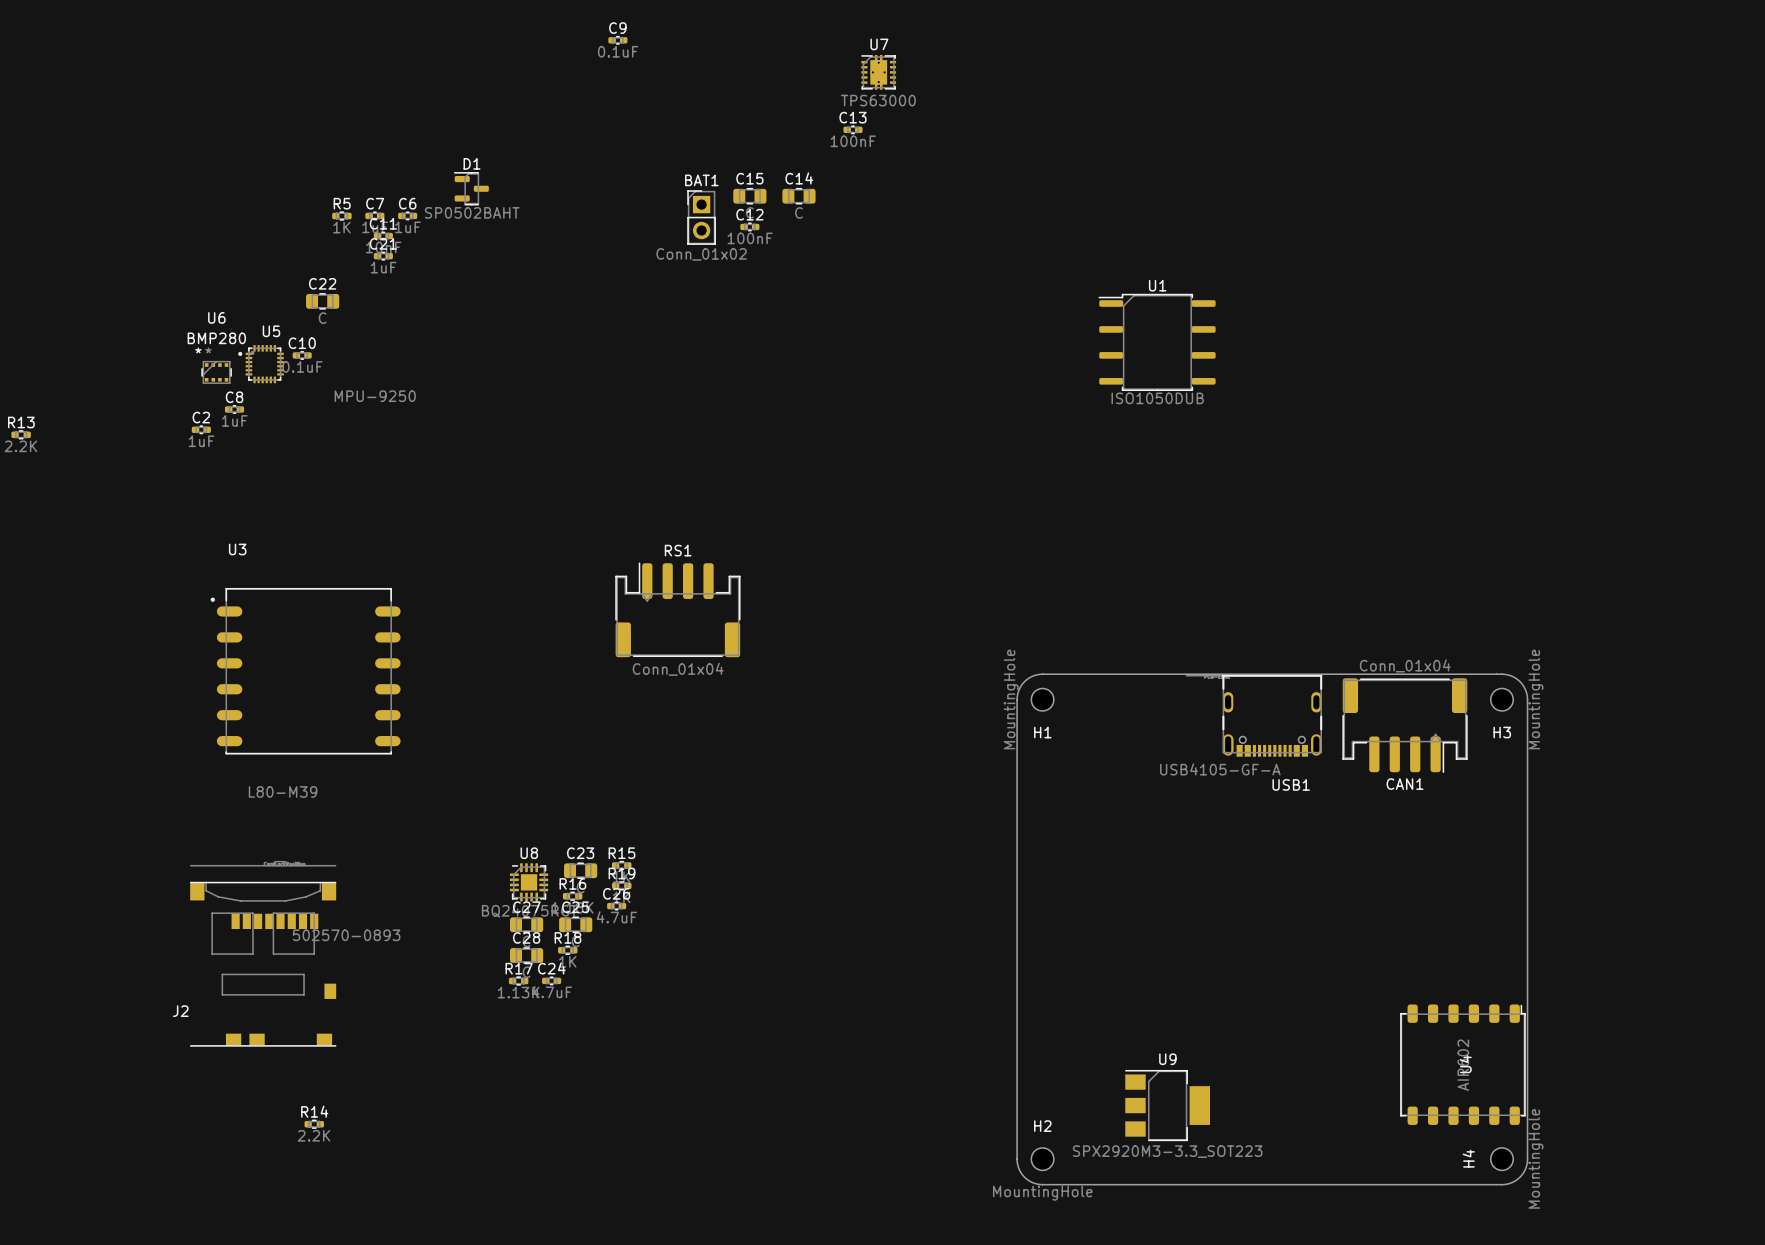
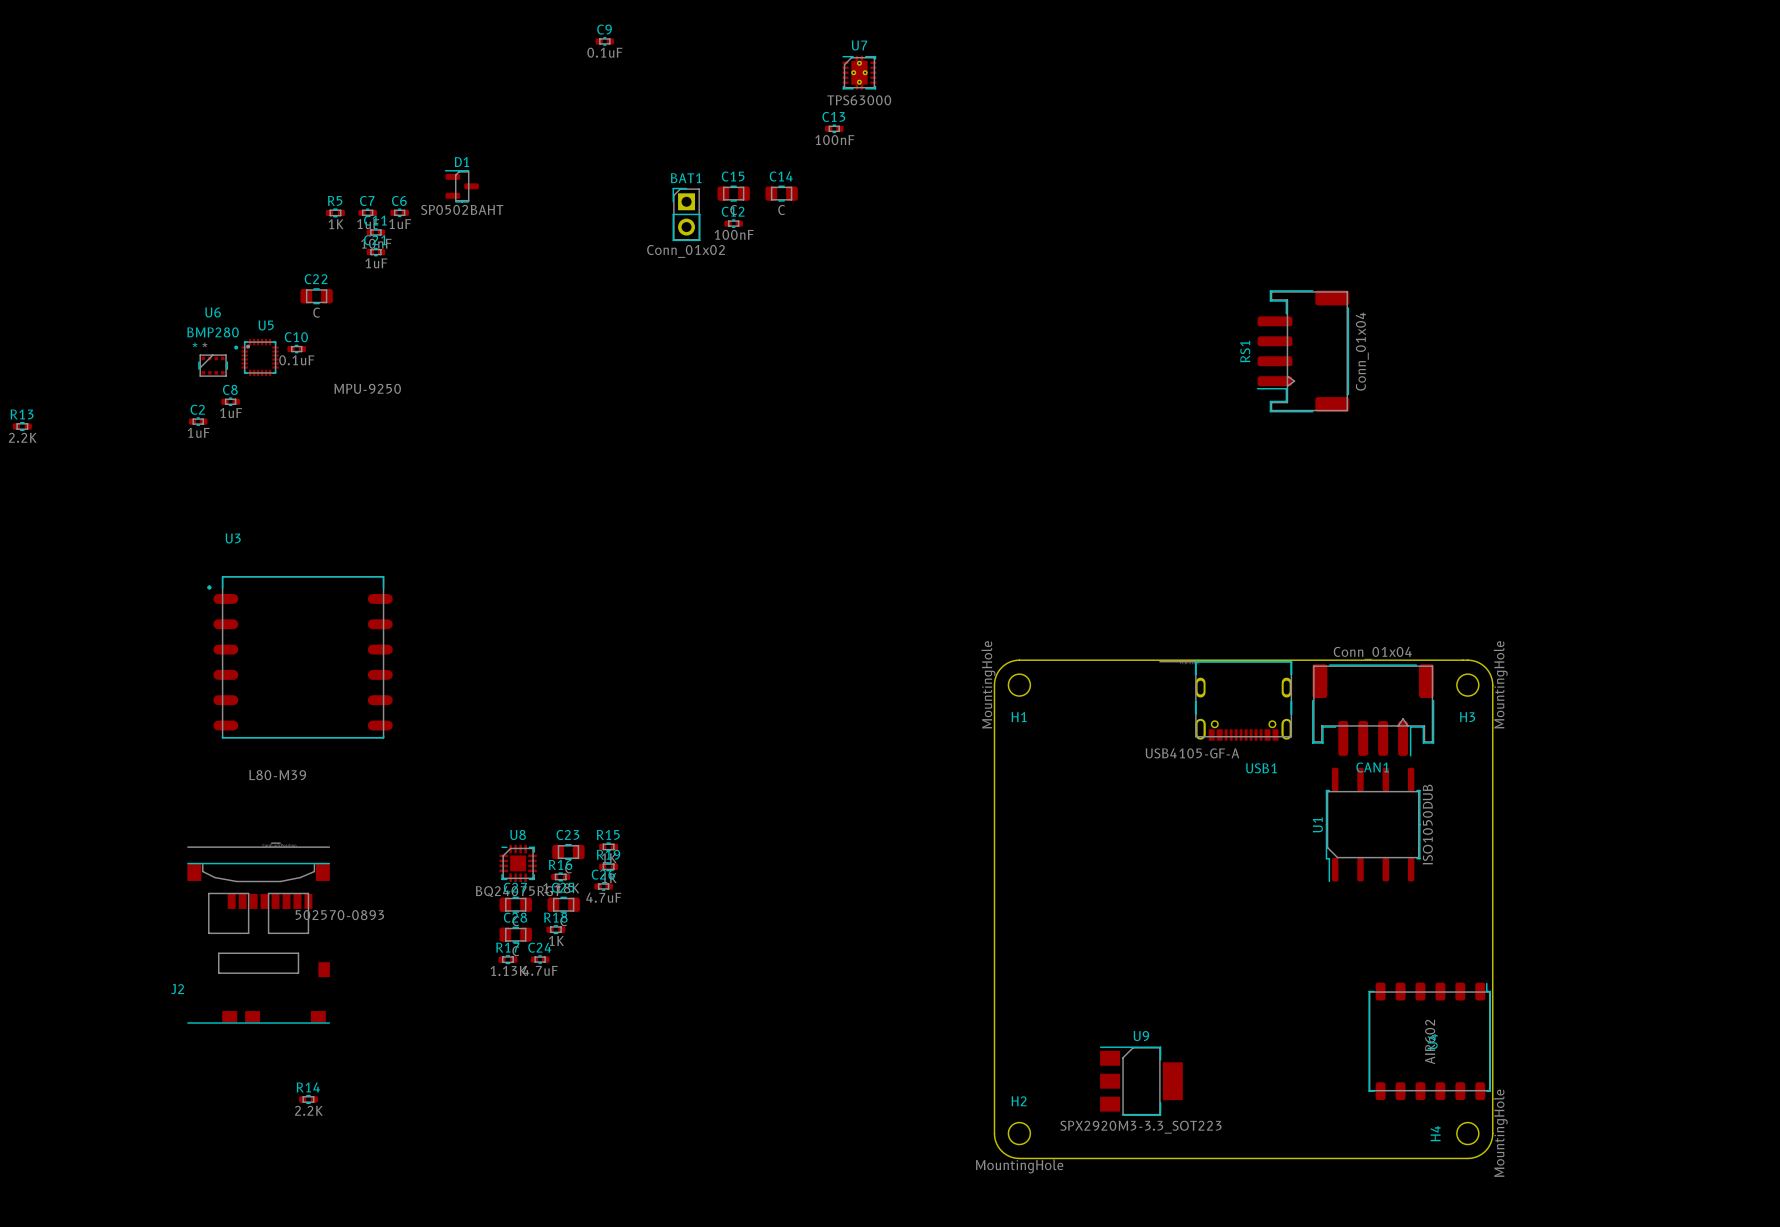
U1 rotation: 0° (1157, 342) -> 90° counterclockwise (1373, 824)
U1 position: (1157, 342) -> (1373, 824)
RS1 rotation: 0° (677, 609) -> 90° counterclockwise (1303, 351)
RS1 position: (677, 609) -> (1303, 351)

